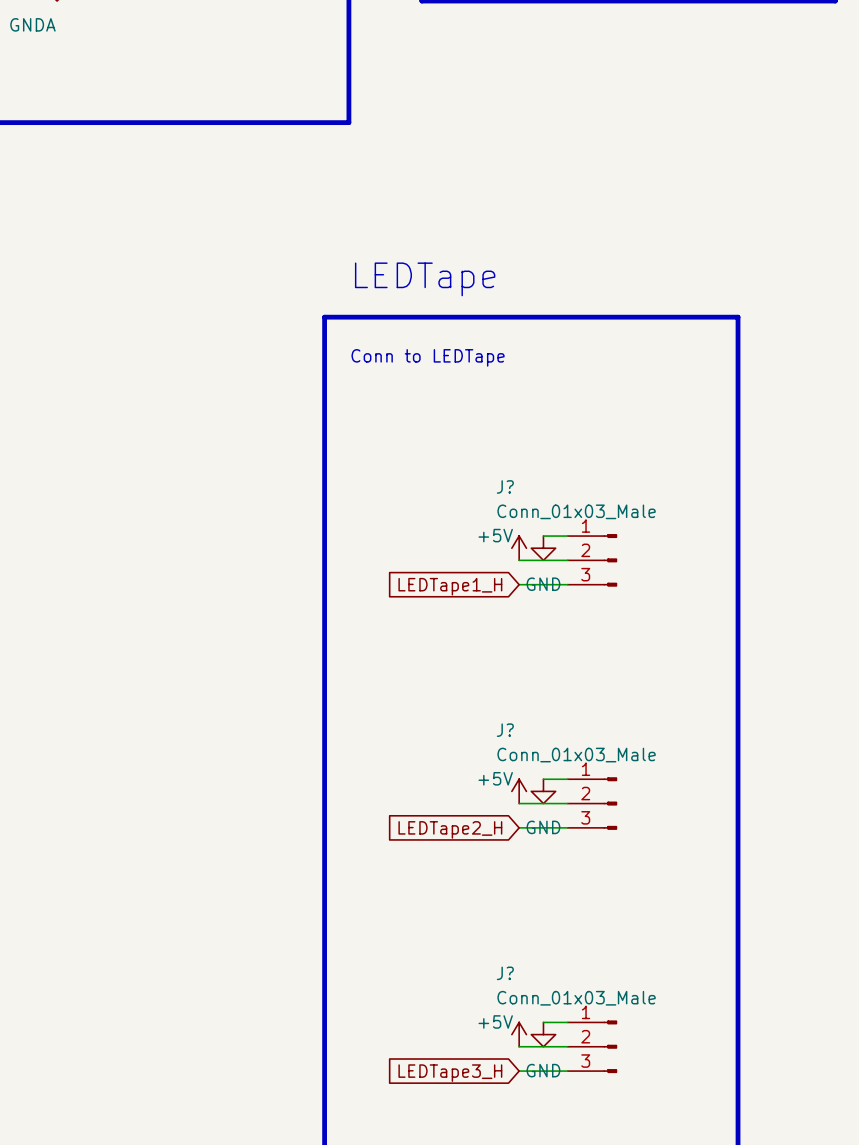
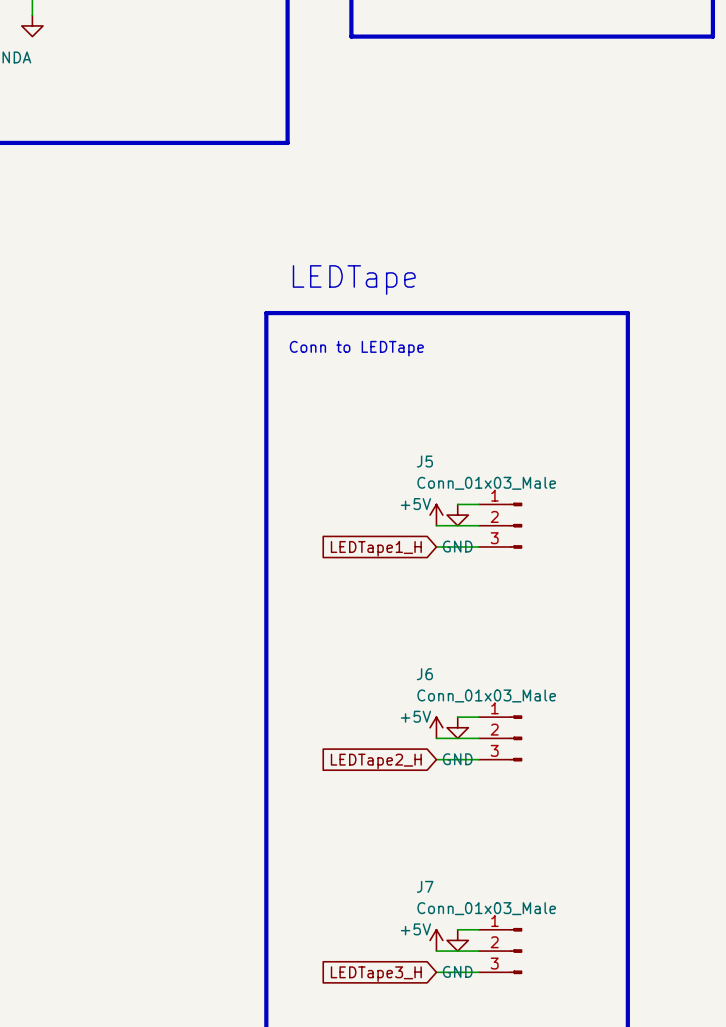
J? name: J? (505, 486) -> J5 (424, 461)
J? name: J? (505, 730) -> J6 (424, 674)
J? name: J? (505, 973) -> J7 (425, 886)

